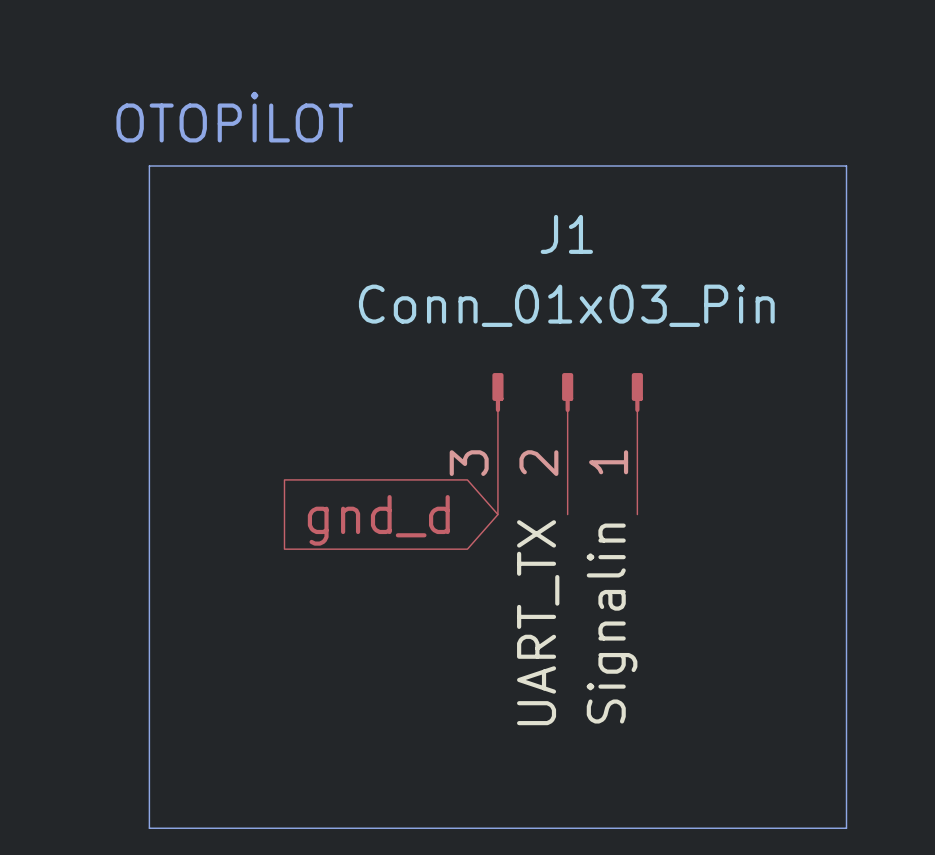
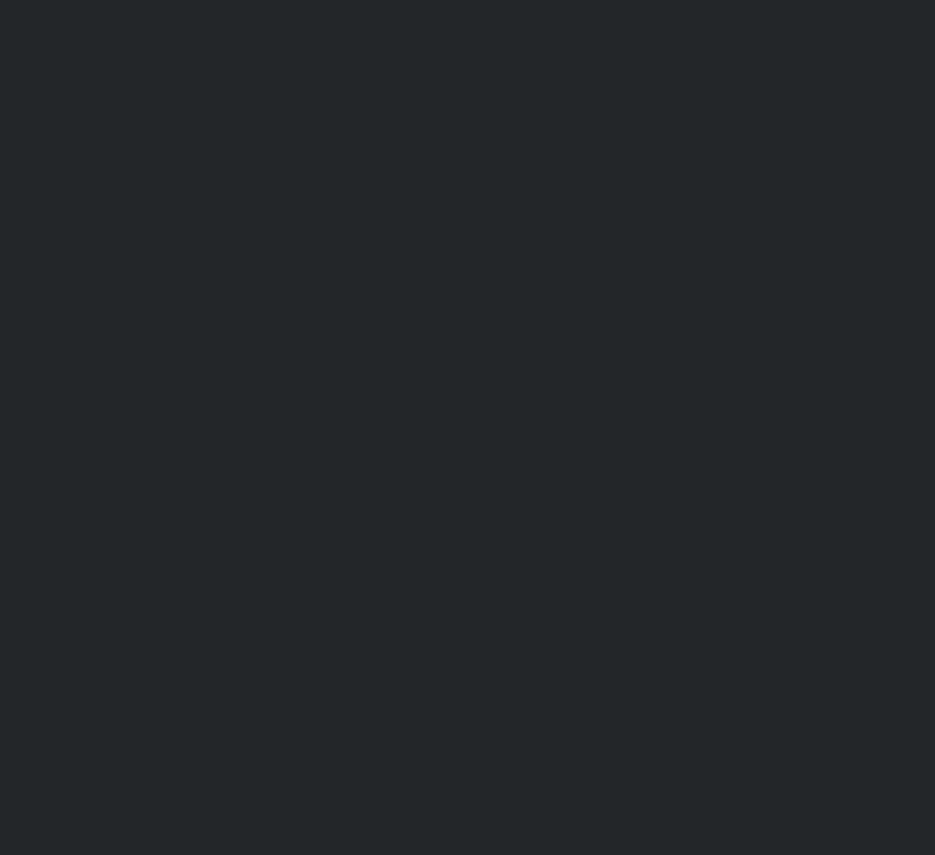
text: OTOPİLOT (234, 117) -> none
line: (149, 165) (846, 165) (846, 828) (149, 828) (149, 165) -> none
J1: Conn_01x03_Pin (567, 443) -> none
global label: gnd_d (378, 520) -> none
label: UART_TX (538, 622) -> none
label: Signalin (612, 623) -> none

